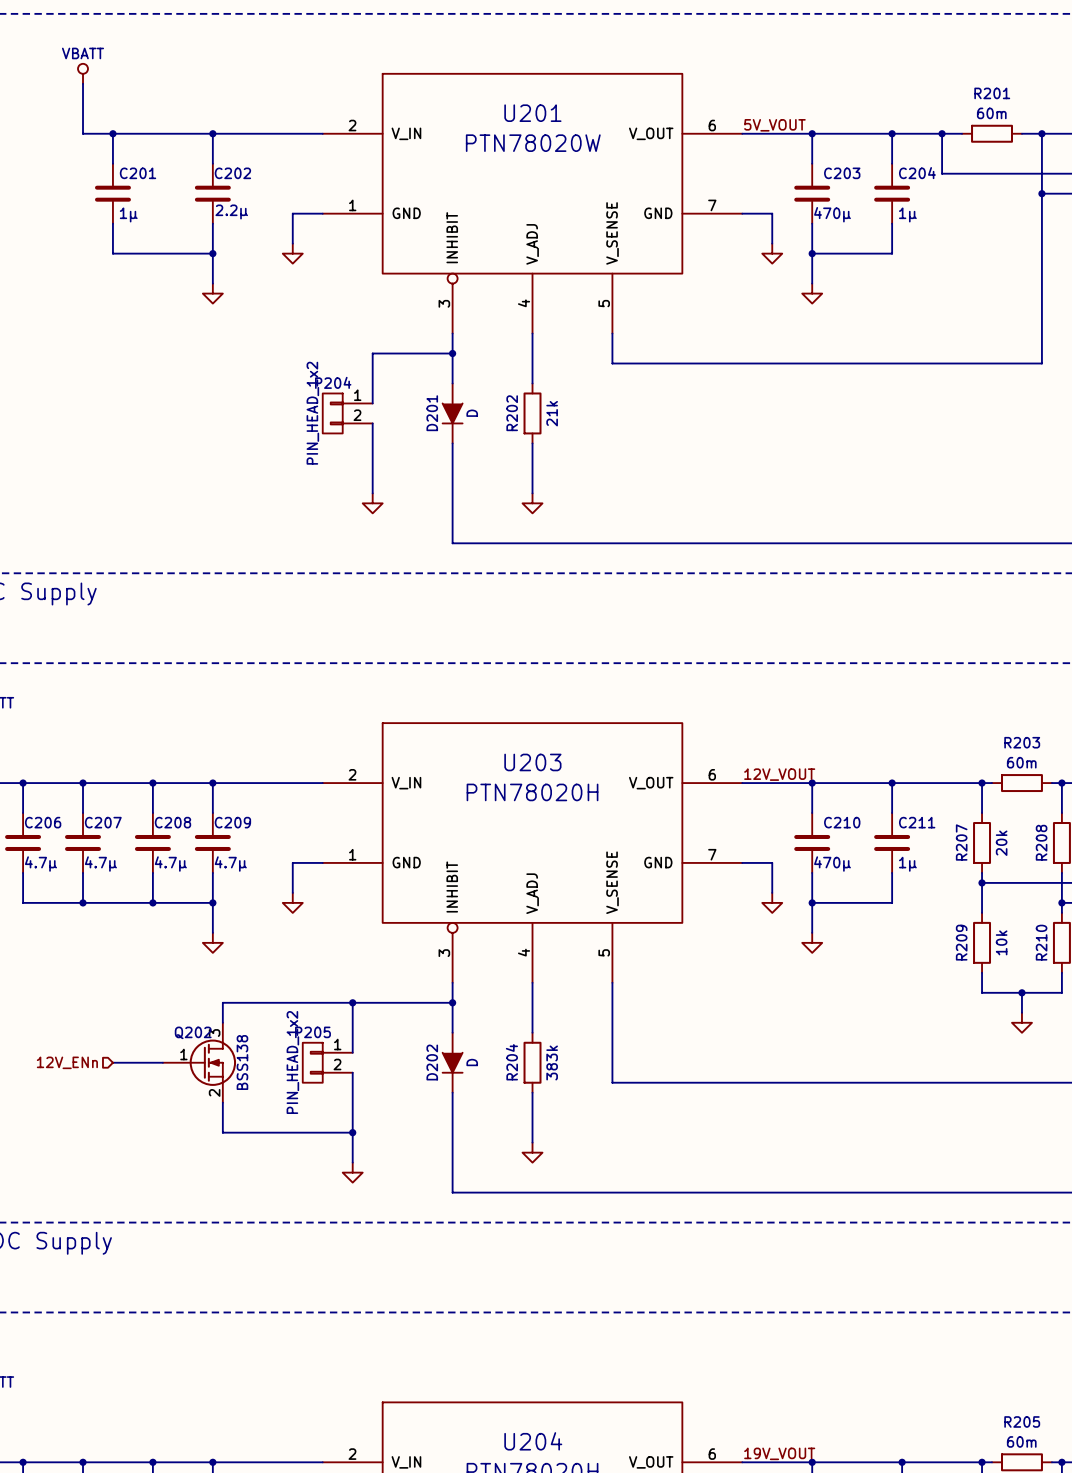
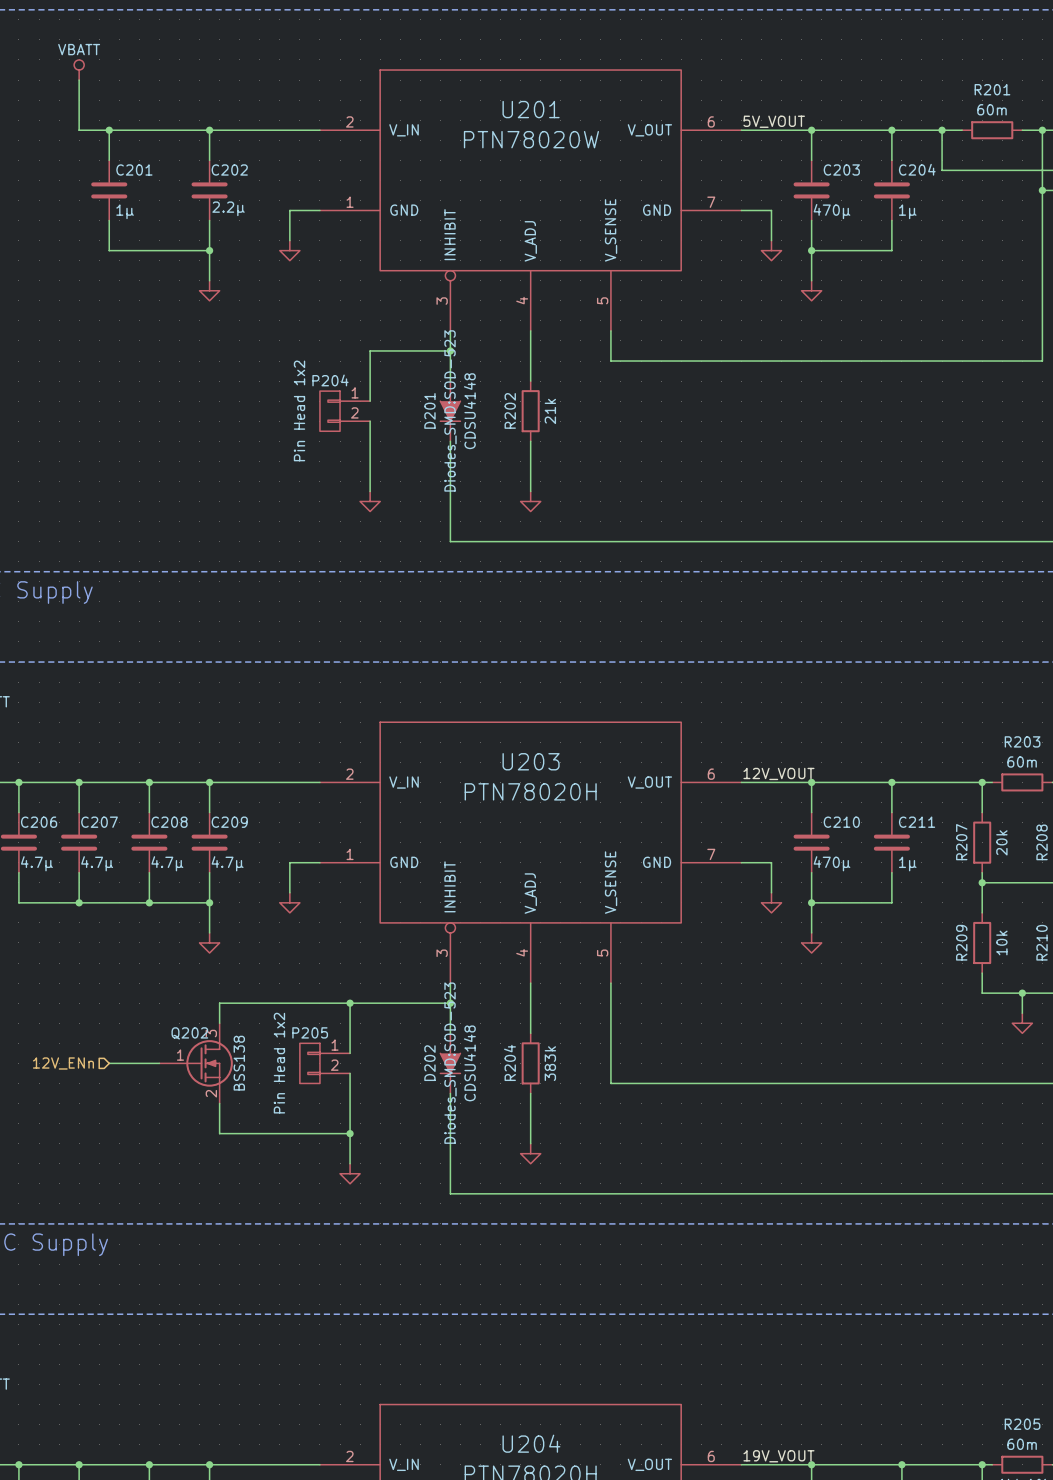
P204 value: PIN_HEAD_1x2 (312, 413) -> Pin Head 1x2 (299, 410)
D201 text: none -> Diodes_SMD:SOD-523 (450, 410)
D201 value: D (472, 413) -> CDSU4148 (469, 411)
P205 value: PIN_HEAD_1x2 (292, 1062) -> Pin Head 1x2 (279, 1063)
D202 text: none -> Diodes_SMD:SOD-523 (450, 1063)
D202 value: D (472, 1062) -> CDSU4148 (469, 1063)

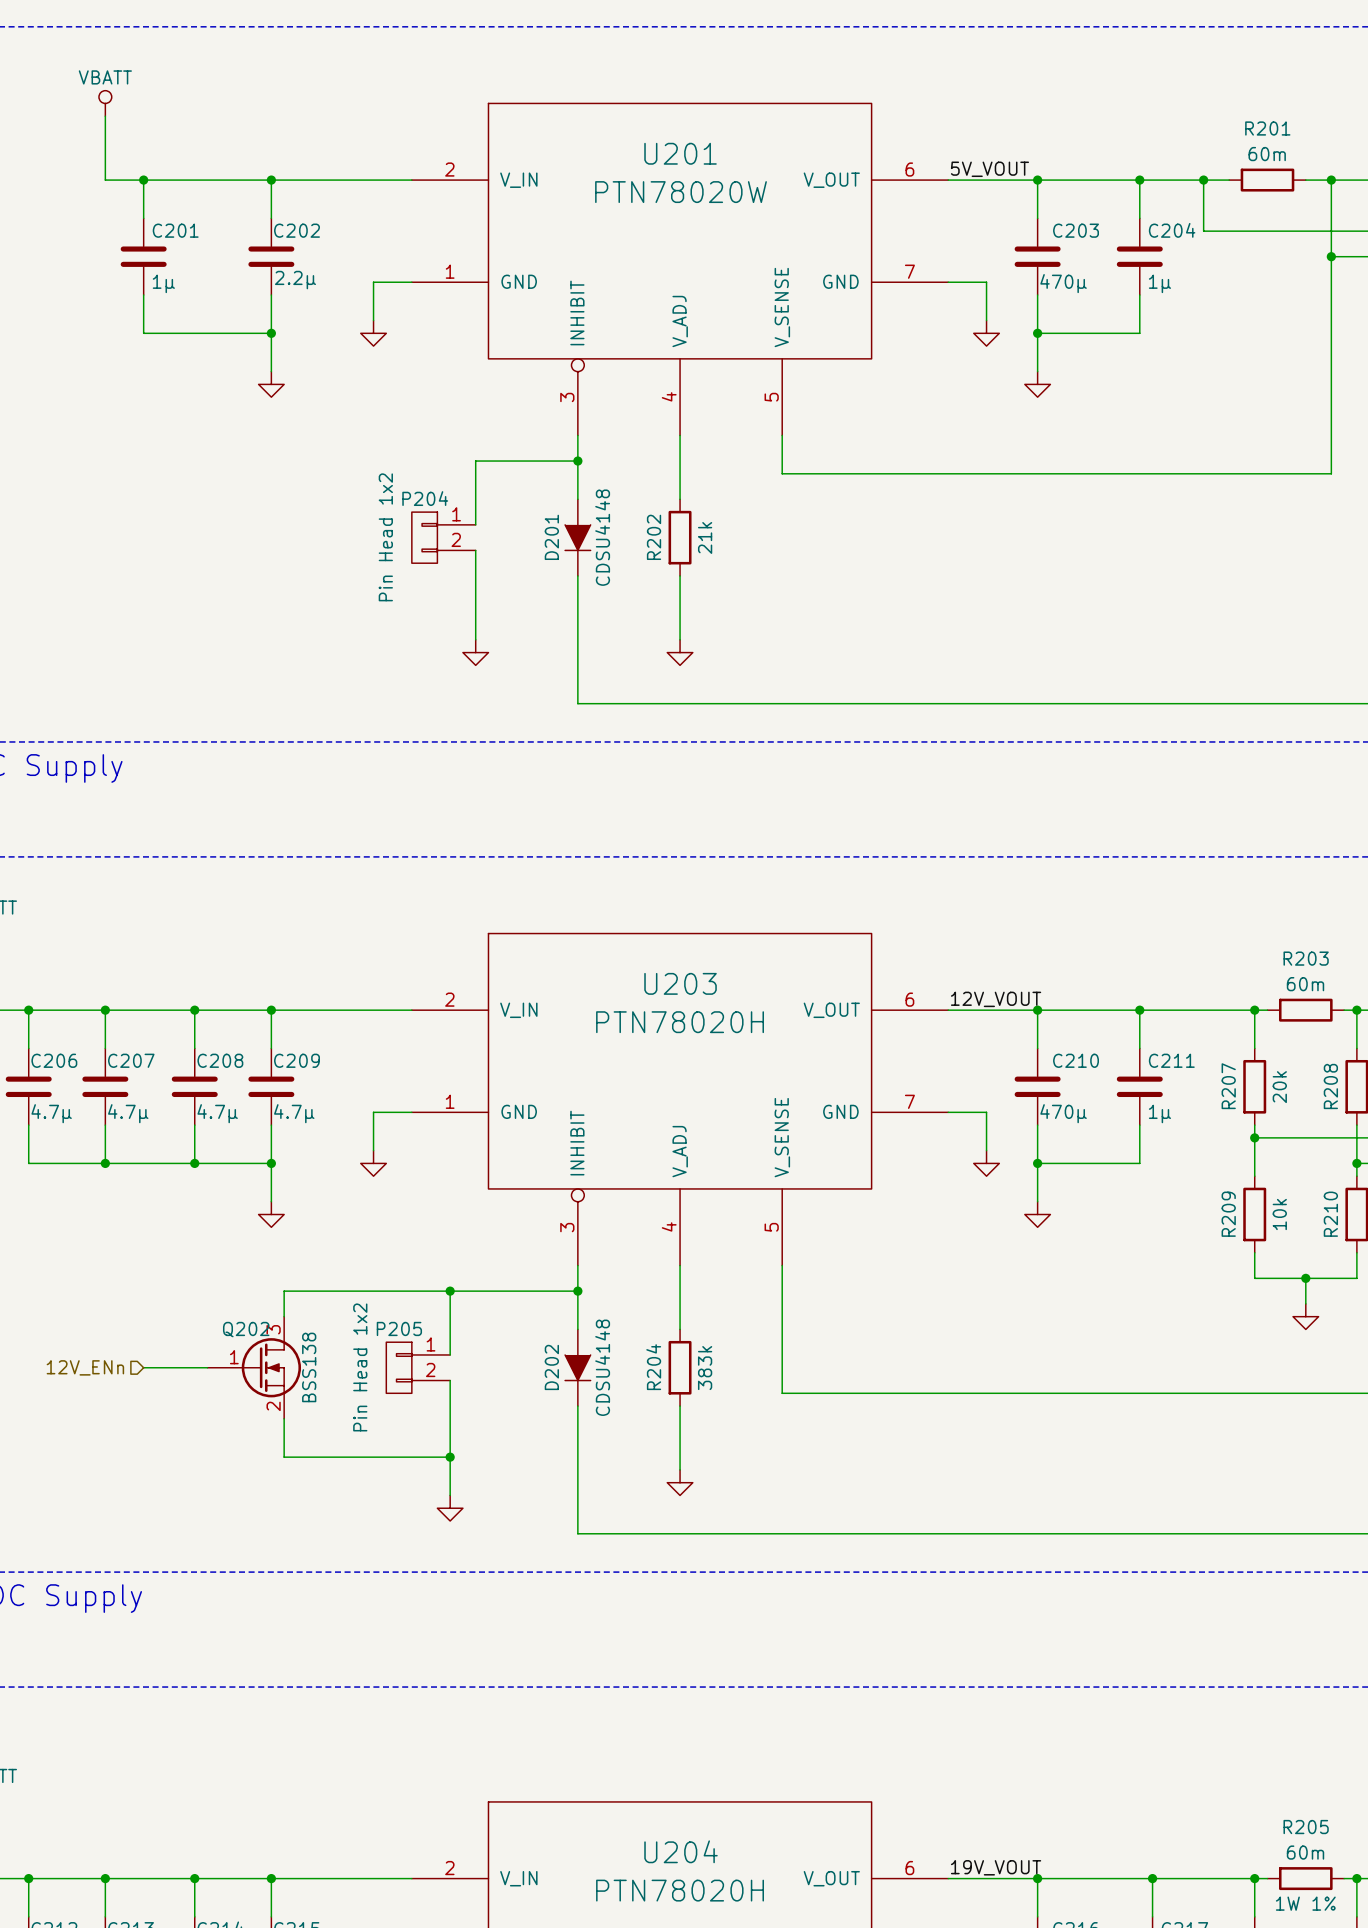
D201 text: Diodes_SMD:SOD-523 (450, 410) -> none
D202 text: Diodes_SMD:SOD-523 (450, 1063) -> none

